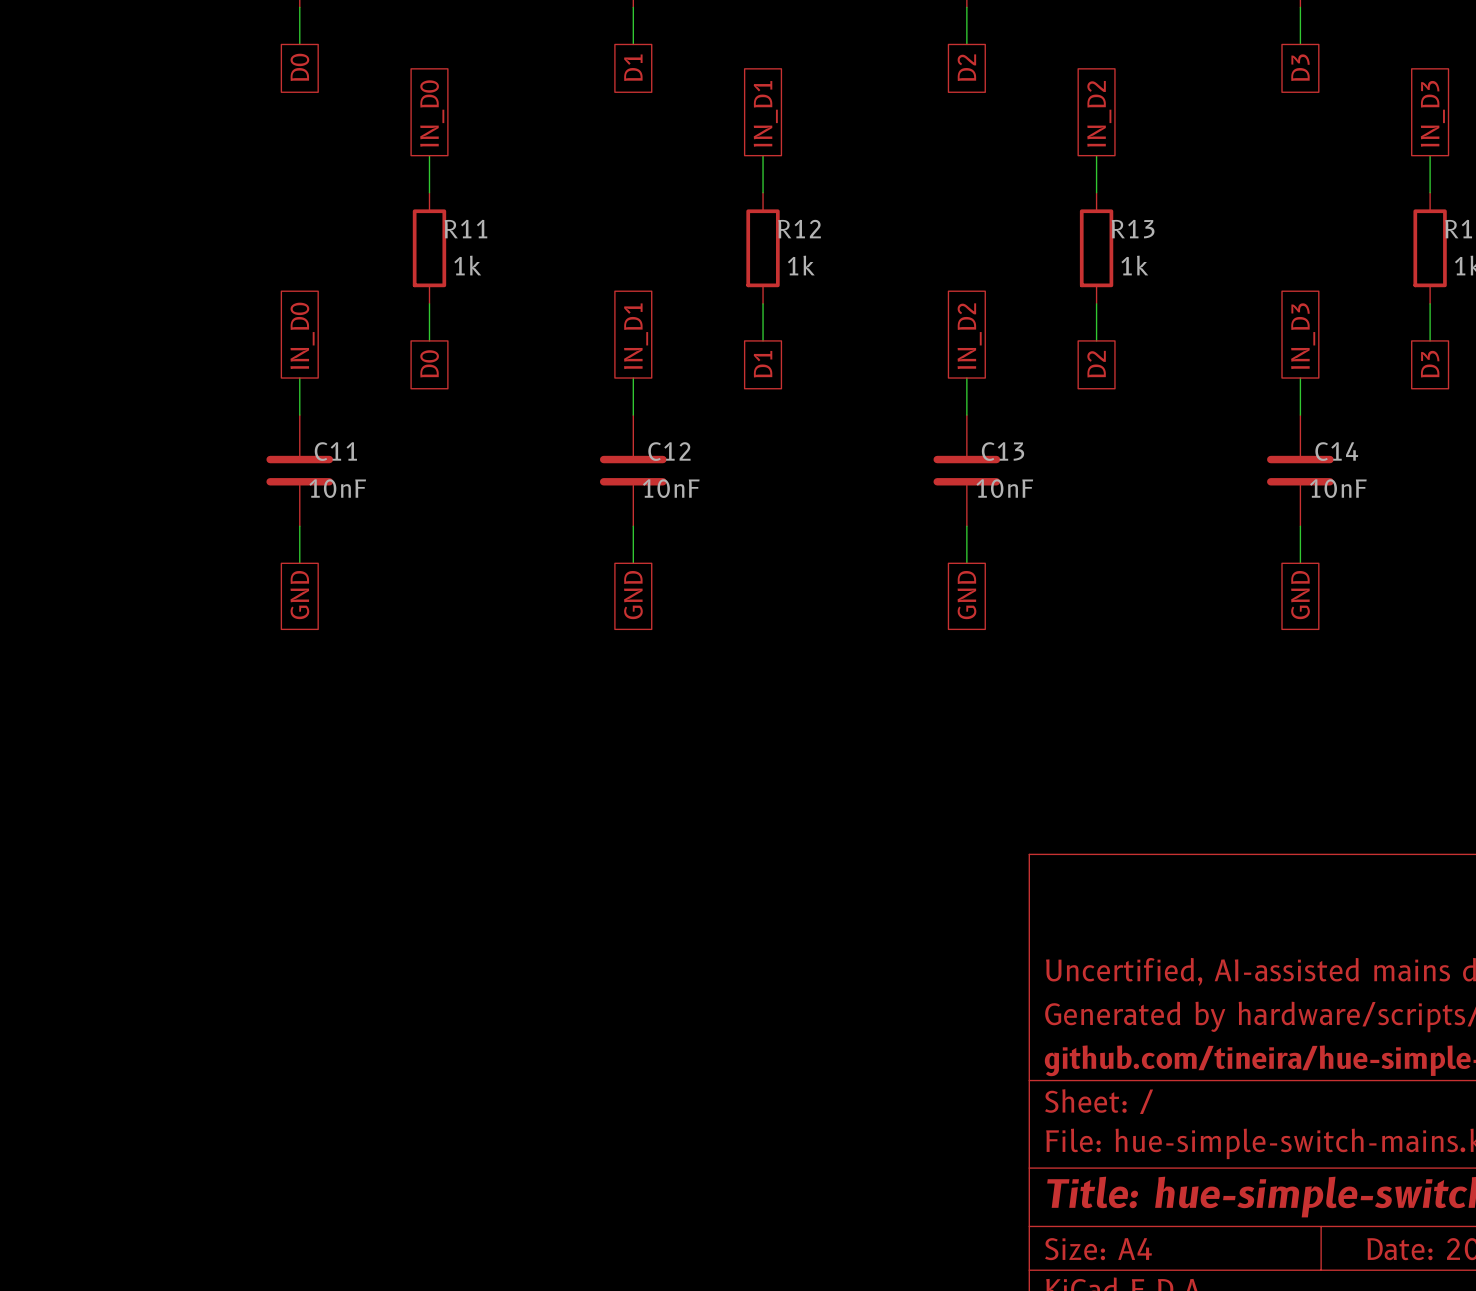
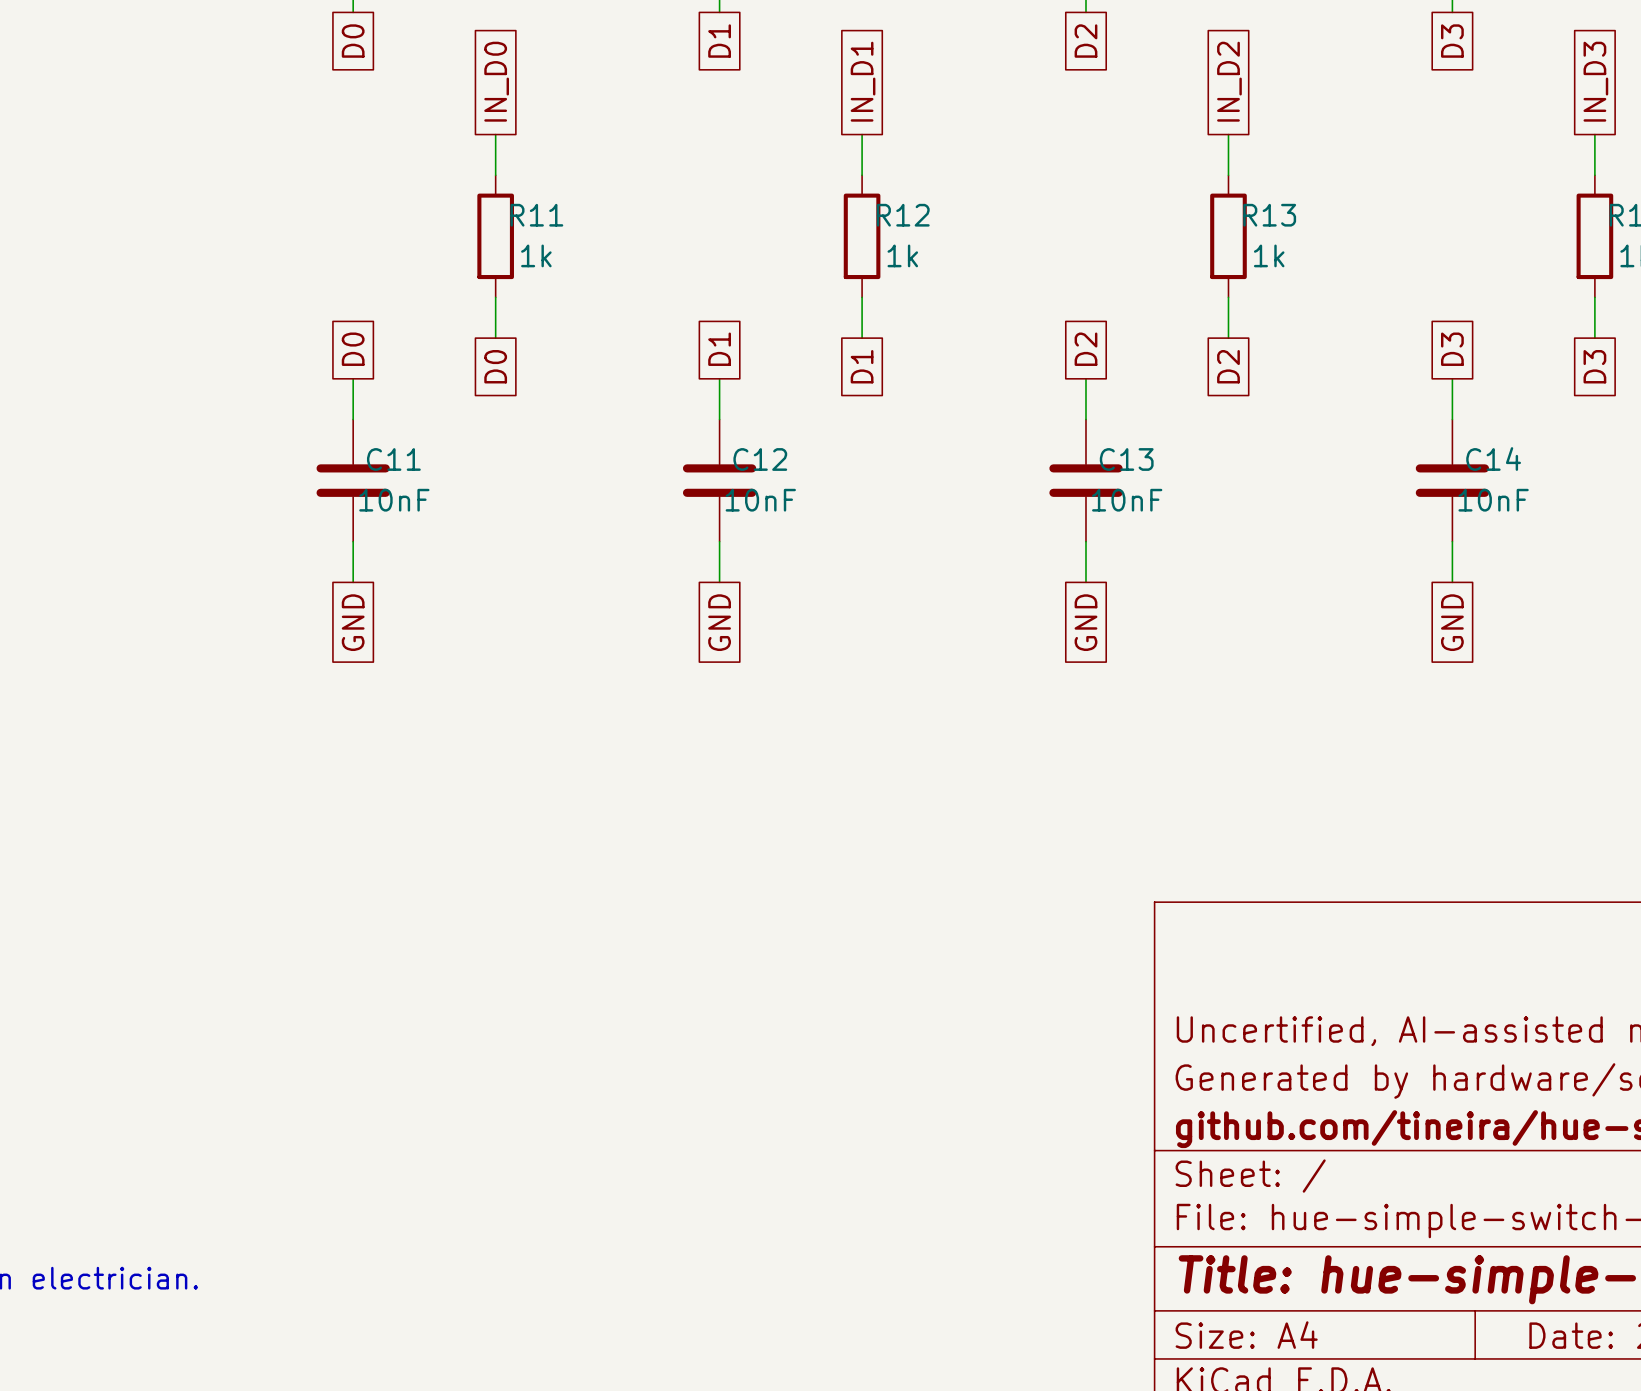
global label: IN_D0 (302, 335) -> D0 (353, 349)
global label: IN_D1 (636, 336) -> D1 (719, 349)
global label: IN_D2 (969, 336) -> D2 (1085, 349)
global label: IN_D3 (1303, 336) -> D3 (1452, 349)

